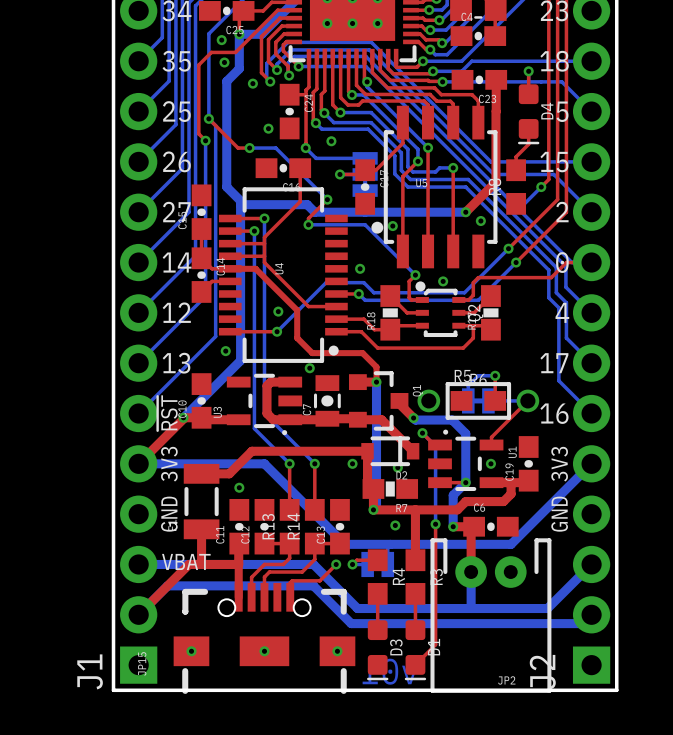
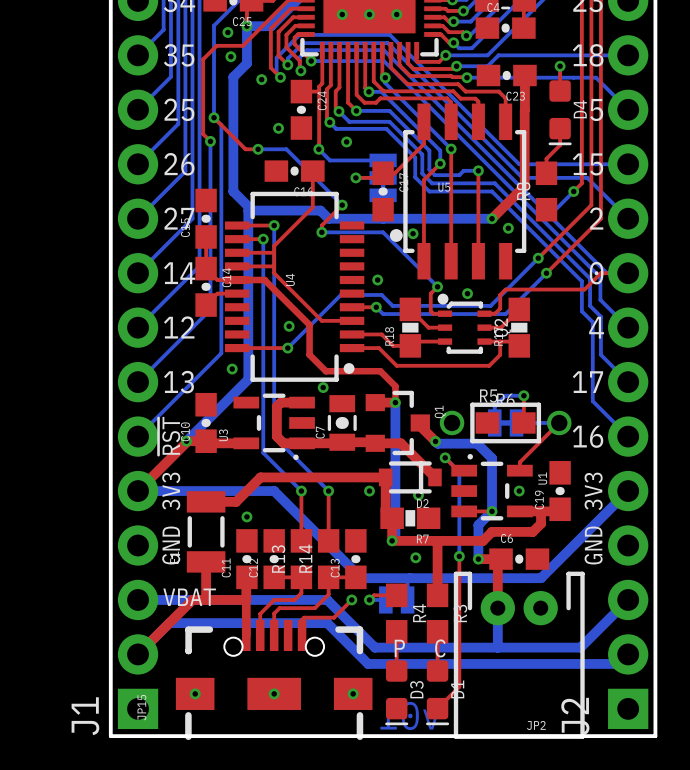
text: none -> P (399, 648)
text: none -> C (440, 648)

